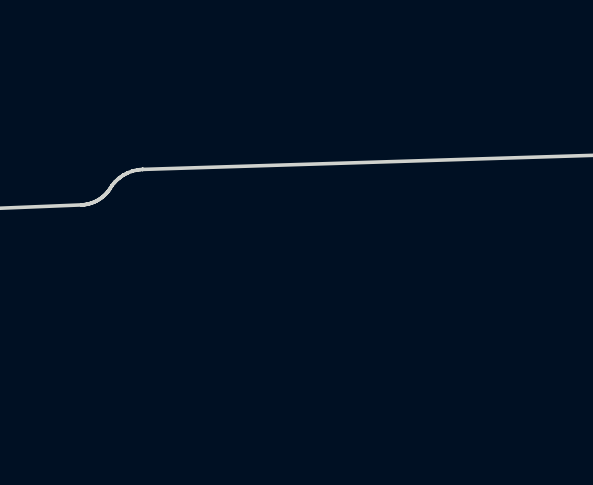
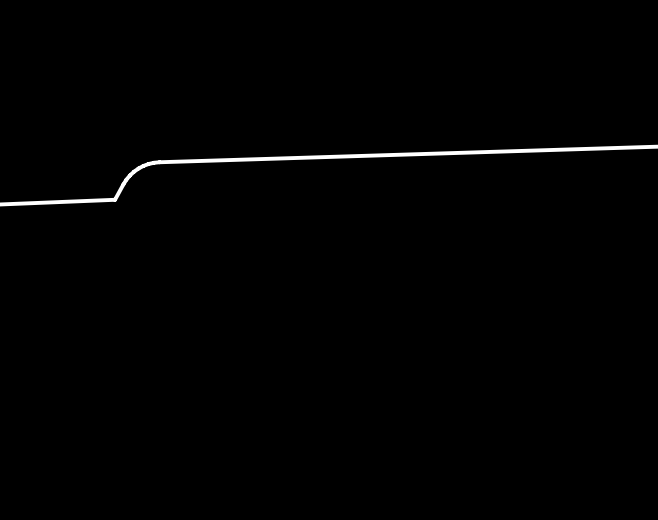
board edge: none -> (124, 182) (115, 199) (93, 200)

